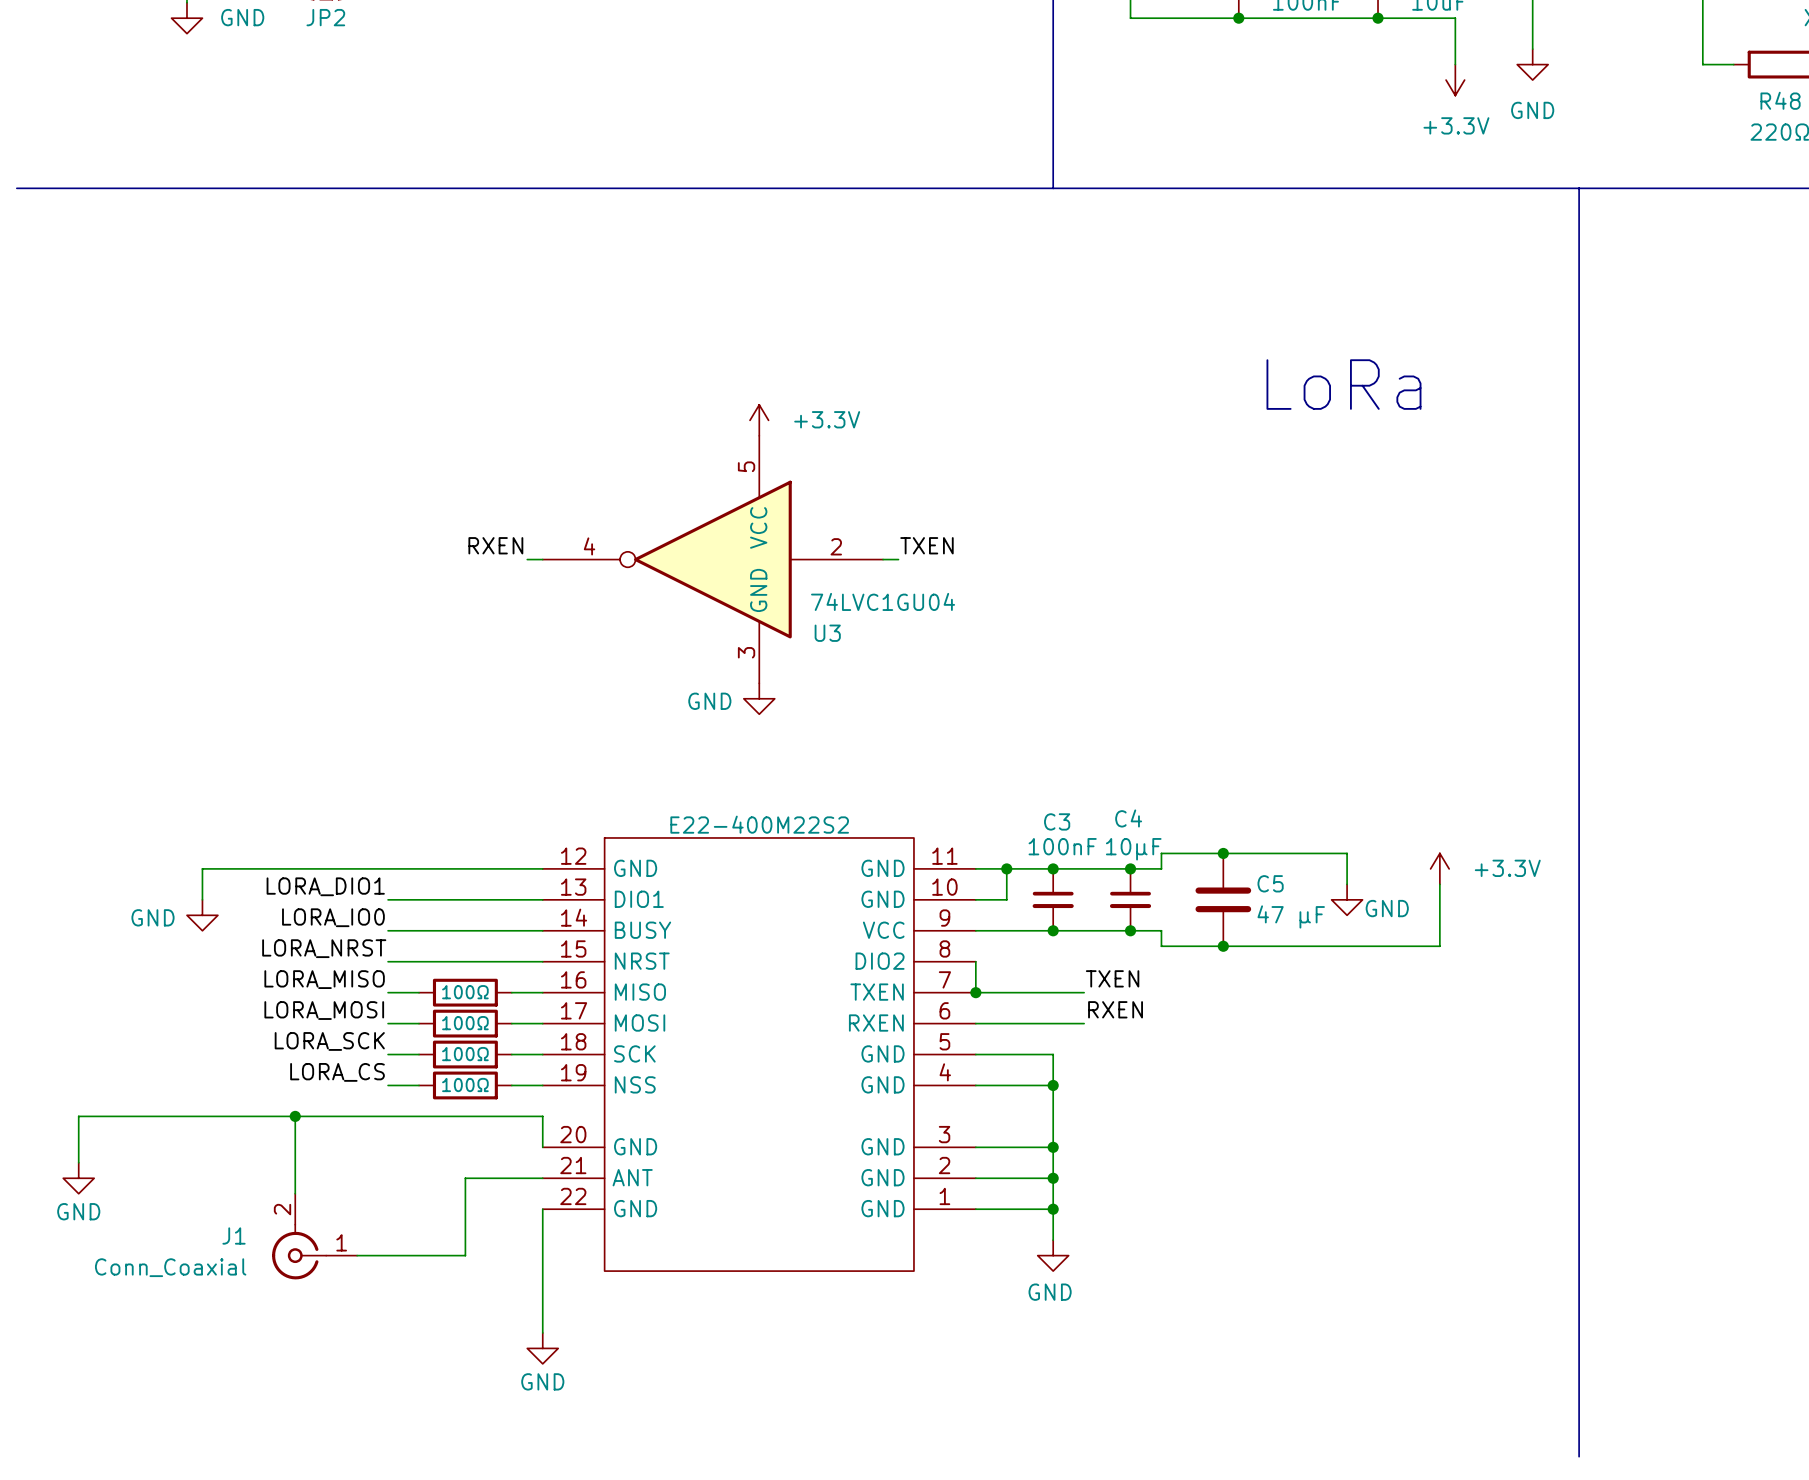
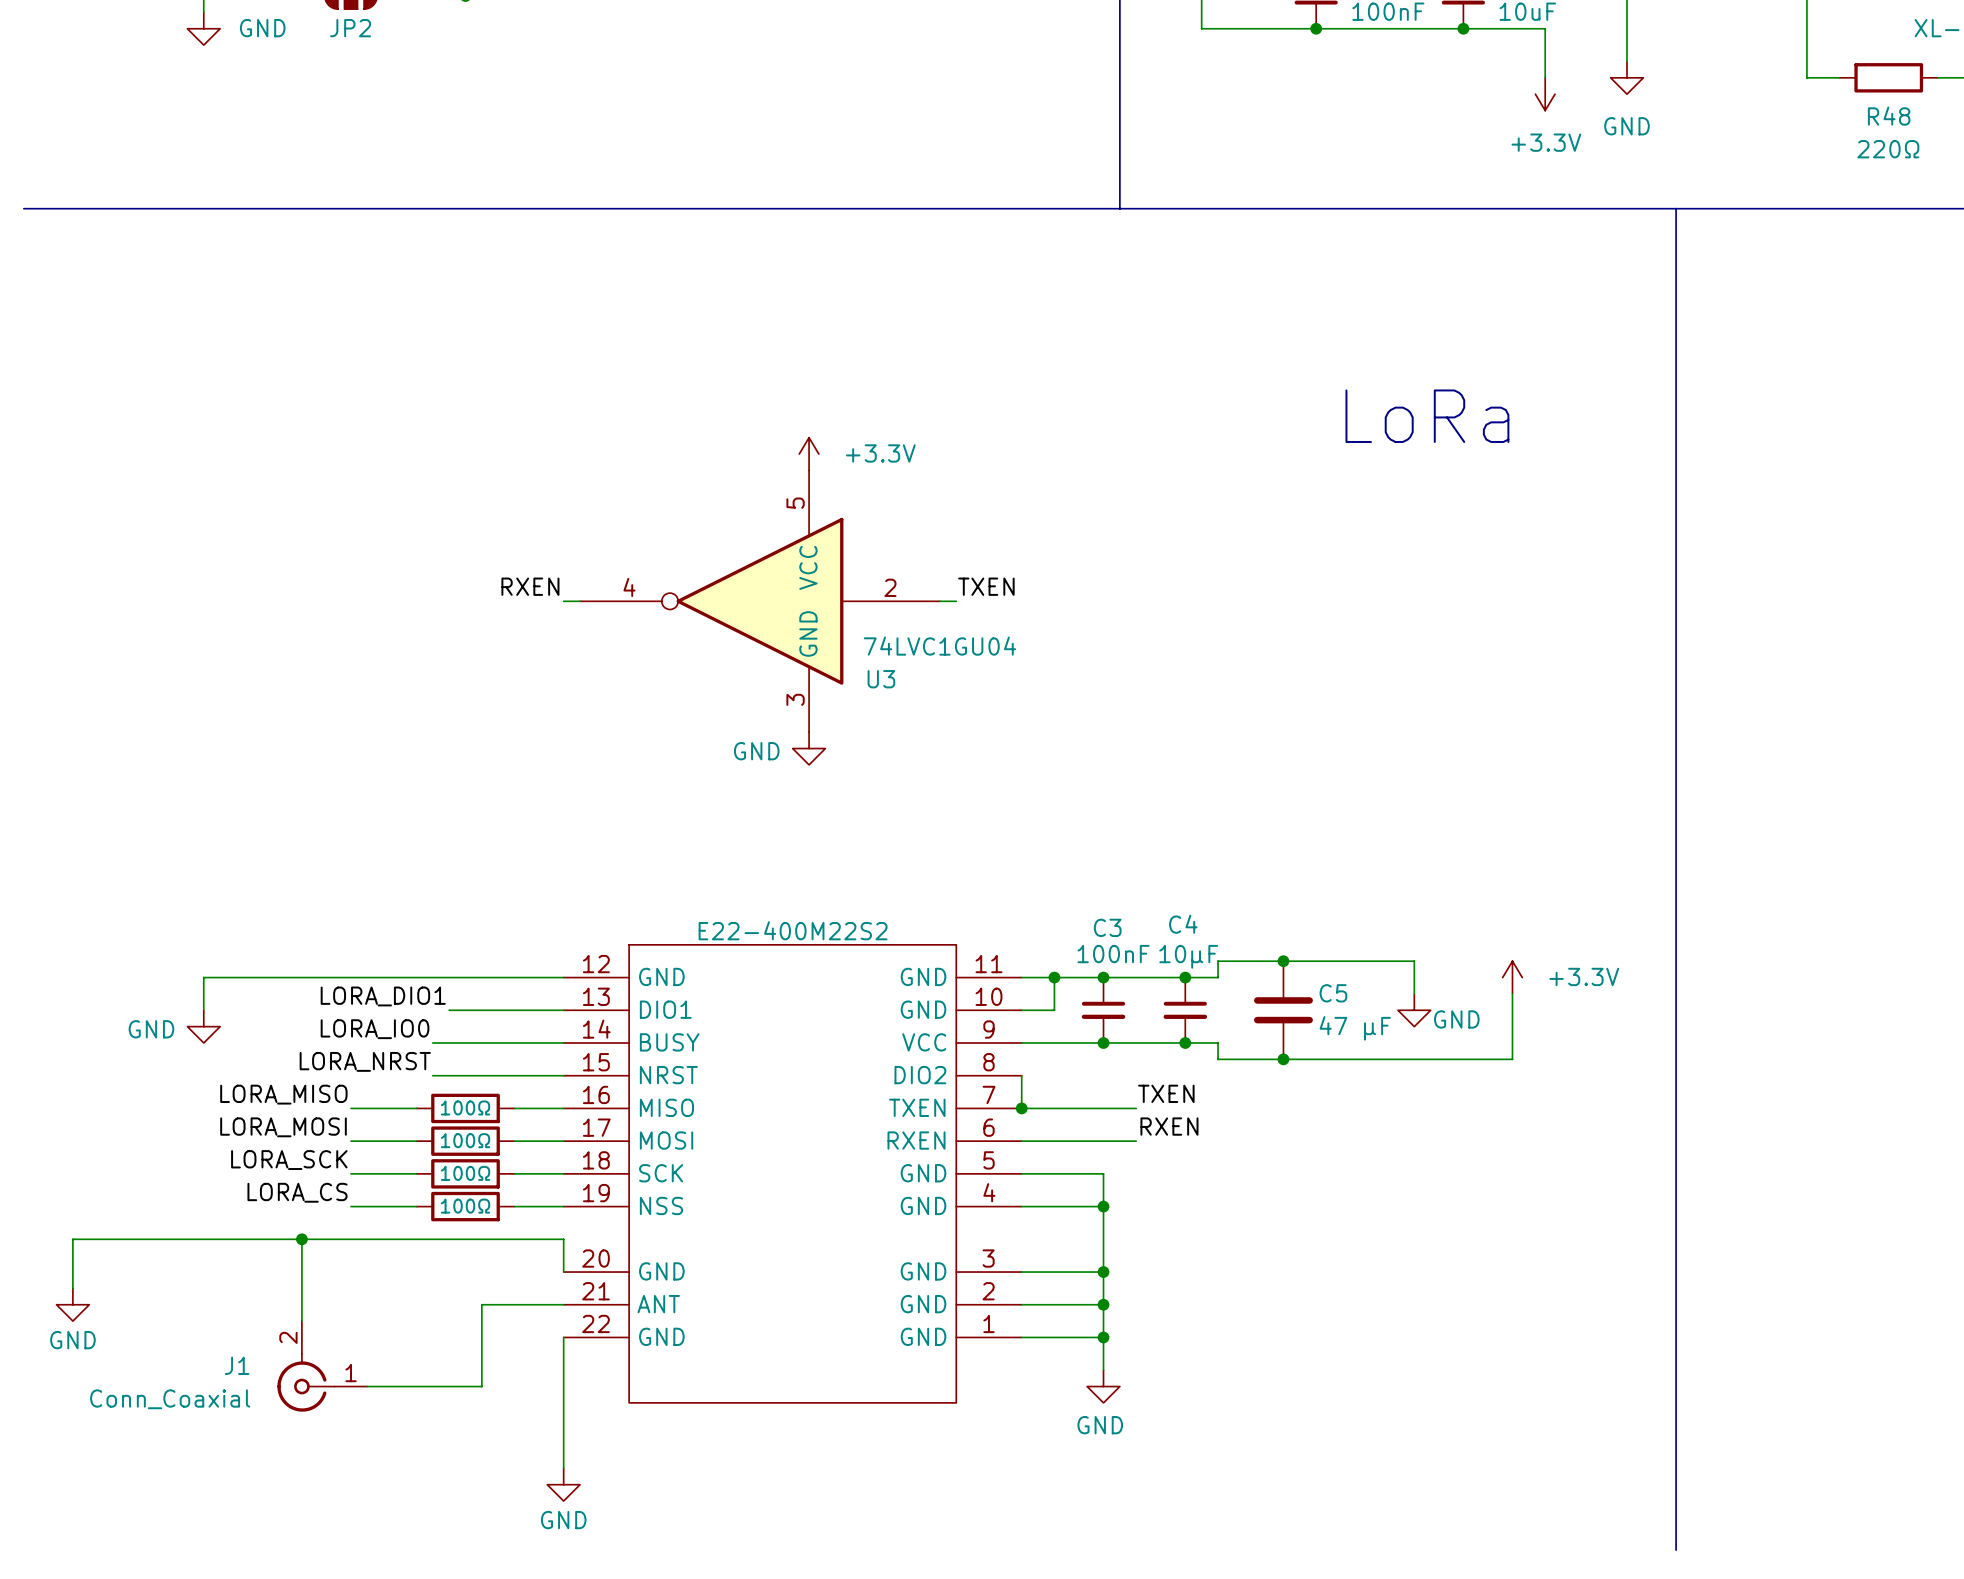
junction: (1223, 853) -> none
wire: (542, 868) (202, 868) (202, 899) -> (563, 977) (203, 977) (203, 1010)
wire: (975, 868) (1161, 868) (1161, 853) (1347, 853) (1347, 884) -> (1021, 977) (1218, 977) (1218, 961) (1414, 961) (1414, 993)
wire: (1006, 868) (1006, 899) (975, 899) -> (1054, 977) (1054, 1010) (1021, 1010)
junction: (1006, 868) -> none
junction: (1053, 868) -> none
junction: (1130, 868) -> none
power symbol position: +3.3V (1439, 868) -> +3.3V (1512, 977)
wire: (1439, 884) (1439, 946) (1161, 946) (1161, 930) (975, 930) -> (1512, 993) (1512, 1059) (1218, 1059) (1218, 1043) (1021, 1043)
label position: LORA_DIO1 (325, 886) -> LORA_DIO1 (383, 996)
wire: (388, 899) (542, 899) -> none
C3 position: (1053, 899) -> (1103, 1010)
C4 position: (1130, 899) -> (1185, 1010)
junction: none -> (1283, 961)
C5 position: (1223, 899) -> (1283, 1010)
power symbol position: GND (1347, 899) -> GND (1414, 1010)
power symbol position: GND (202, 915) -> GND (203, 1026)
junction: none -> (1054, 977)
label position: LORA_IO0 (333, 917) -> LORA_IO0 (375, 1029)
wire: (388, 930) (542, 930) -> none
junction position: (1053, 930) -> (1103, 977)
junction position: (1130, 930) -> (1185, 977)
wire: none -> (449, 1010) (563, 1010)
junction: (1223, 946) -> none
label position: LORA_NRST (324, 948) -> LORA_NRST (365, 1061)
wire: (388, 961) (542, 961) -> none
wire: (975, 961) (975, 992) (1084, 992) -> (1021, 1075) (1021, 1108) (1136, 1108)
wire: none -> (432, 1043) (563, 1043)
junction: none -> (1103, 1043)
junction: none -> (1185, 1043)
label position: TXEN (1112, 978) -> TXEN (1166, 1093)
label position: LORA_MISO (324, 979) -> LORA_MISO (283, 1094)
wire: (388, 992) (419, 992) -> none
part: 100Ω (465, 992) -> none
wire: (511, 992) (542, 992) -> none
junction: (975, 992) -> none
junction: none -> (1283, 1059)
wire: none -> (432, 1075) (563, 1075)
label position: RXEN (1115, 1009) -> RXEN (1169, 1126)
label position: LORA_MOSI (324, 1010) -> LORA_MOSI (283, 1127)
wire: (388, 1023) (419, 1023) -> none
part: 100Ω (465, 1023) -> none
wire: (511, 1023) (542, 1023) -> none
wire: (975, 1023) (1084, 1023) -> (1021, 1141) (1136, 1141)
wire: none -> (351, 1108) (416, 1108)
part: none -> 100Ω (465, 1108)
wire: none -> (514, 1108) (563, 1108)
junction: none -> (1021, 1108)
label position: LORA_SCK (329, 1041) -> LORA_SCK (289, 1160)
wire: (388, 1054) (419, 1054) -> none
part: 100Ω (465, 1054) -> none
wire: (511, 1054) (542, 1054) -> none
E22-400M22S2 position: (759, 1054) -> (792, 1173)
wire: (975, 1054) (1053, 1054) (1053, 1240) -> (1021, 1173) (1103, 1173) (1103, 1370)
wire: none -> (351, 1141) (416, 1141)
part: none -> 100Ω (465, 1141)
wire: none -> (514, 1141) (563, 1141)
label position: LORA_CS (337, 1072) -> LORA_CS (297, 1192)
wire: (388, 1085) (419, 1085) -> none
part: 100Ω (465, 1085) -> none
wire: (511, 1085) (542, 1085) -> none
wire: (975, 1085) (1053, 1085) -> (1021, 1206) (1103, 1206)
junction: (1053, 1085) -> none
wire: none -> (351, 1173) (416, 1173)
part: none -> 100Ω (465, 1173)
wire: none -> (514, 1173) (563, 1173)
wire: (295, 1116) (295, 1193) -> (301, 1239) (301, 1321)
junction position: (295, 1116) -> (301, 1239)
wire: none -> (351, 1206) (416, 1206)
part: none -> 100Ω (465, 1206)
wire: none -> (514, 1206) (563, 1206)
wire: (542, 1147) (542, 1116) (78, 1116) (78, 1162) -> (563, 1272) (563, 1239) (72, 1239) (72, 1288)
wire: (975, 1147) (1053, 1147) -> (1021, 1272) (1103, 1272)
junction position: (1053, 1147) -> (1103, 1206)
power symbol position: GND (78, 1178) -> GND (72, 1304)
wire: (542, 1178) (465, 1178) (465, 1255) (357, 1255) -> (563, 1304) (481, 1304) (481, 1386) (367, 1386)
wire: (975, 1178) (1053, 1178) -> (1021, 1304) (1103, 1304)
junction: (1053, 1178) -> none
junction: none -> (1103, 1272)
wire: (542, 1209) (542, 1332) -> (563, 1337) (563, 1468)
wire: (975, 1209) (1053, 1209) -> (1021, 1337) (1103, 1337)
junction: (1053, 1209) -> none
junction: none -> (1103, 1304)
J1 position: (314, 1236) -> (322, 1366)
junction: none -> (1103, 1337)
power symbol position: GND (1053, 1255) -> GND (1103, 1386)
power symbol position: GND (542, 1348) -> GND (563, 1484)

